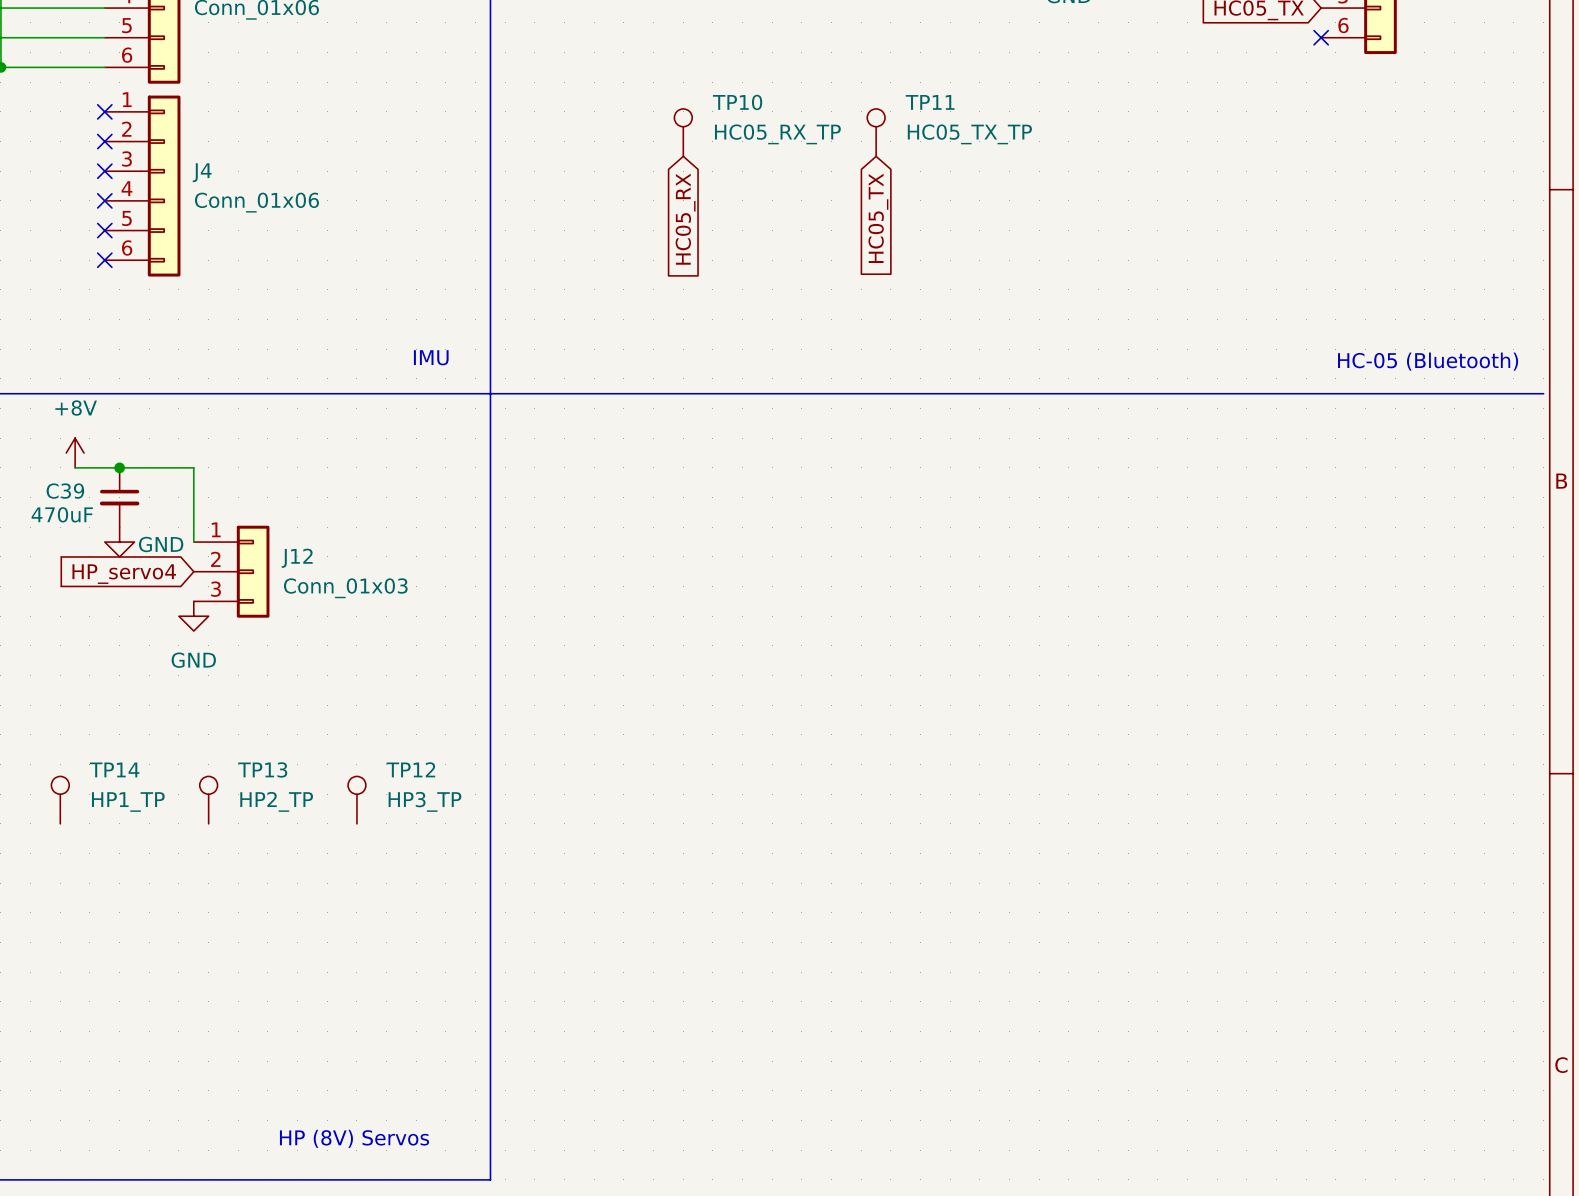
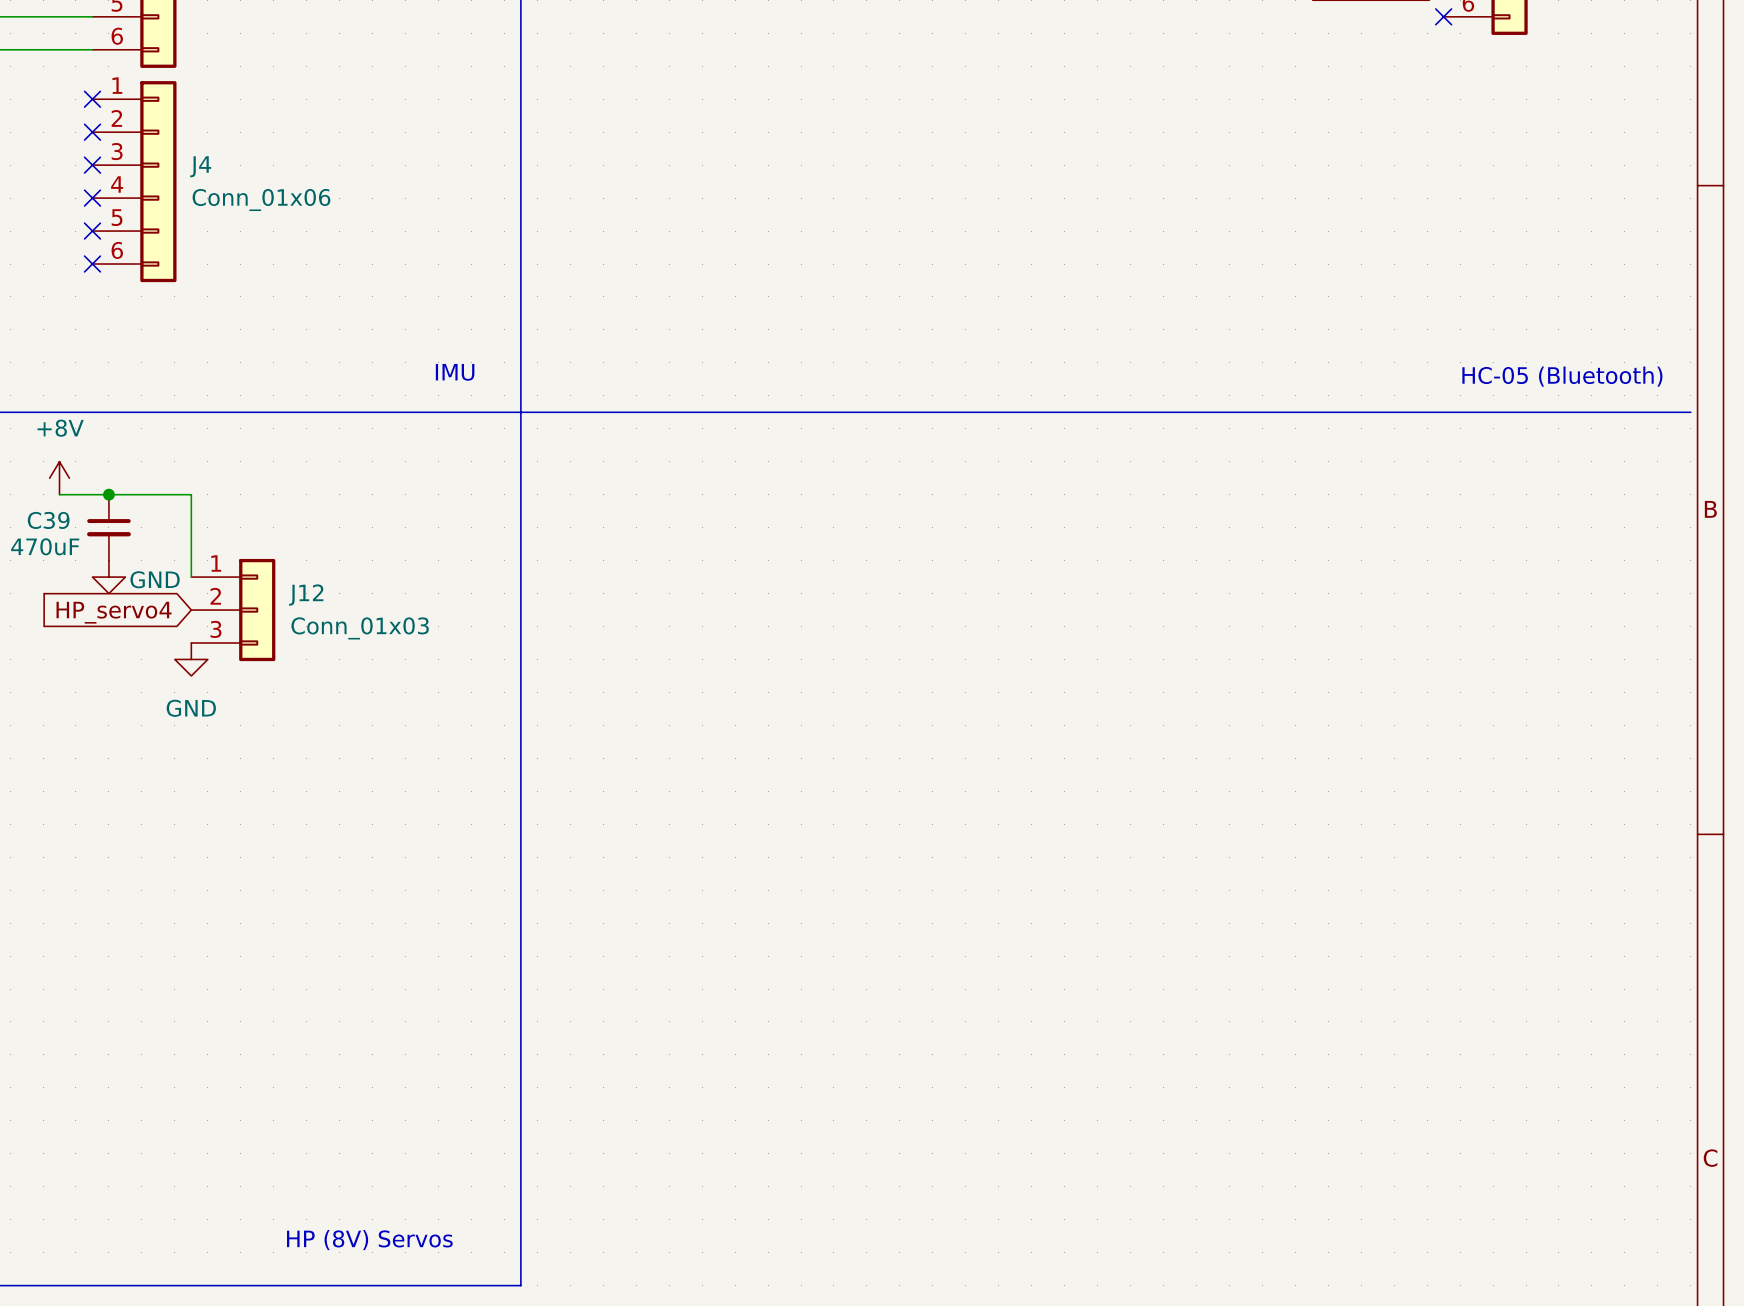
TP10: HC05_RX_TP (683, 132) -> none
TP11: HC05_TX_TP (876, 132) -> none
global label: HC05_TX (878, 218) -> none
global label: HC05_RX (685, 219) -> none
TP14: HP1_TP (60, 800) -> none
TP13: HP2_TP (208, 800) -> none
TP12: HP3_TP (356, 800) -> none

